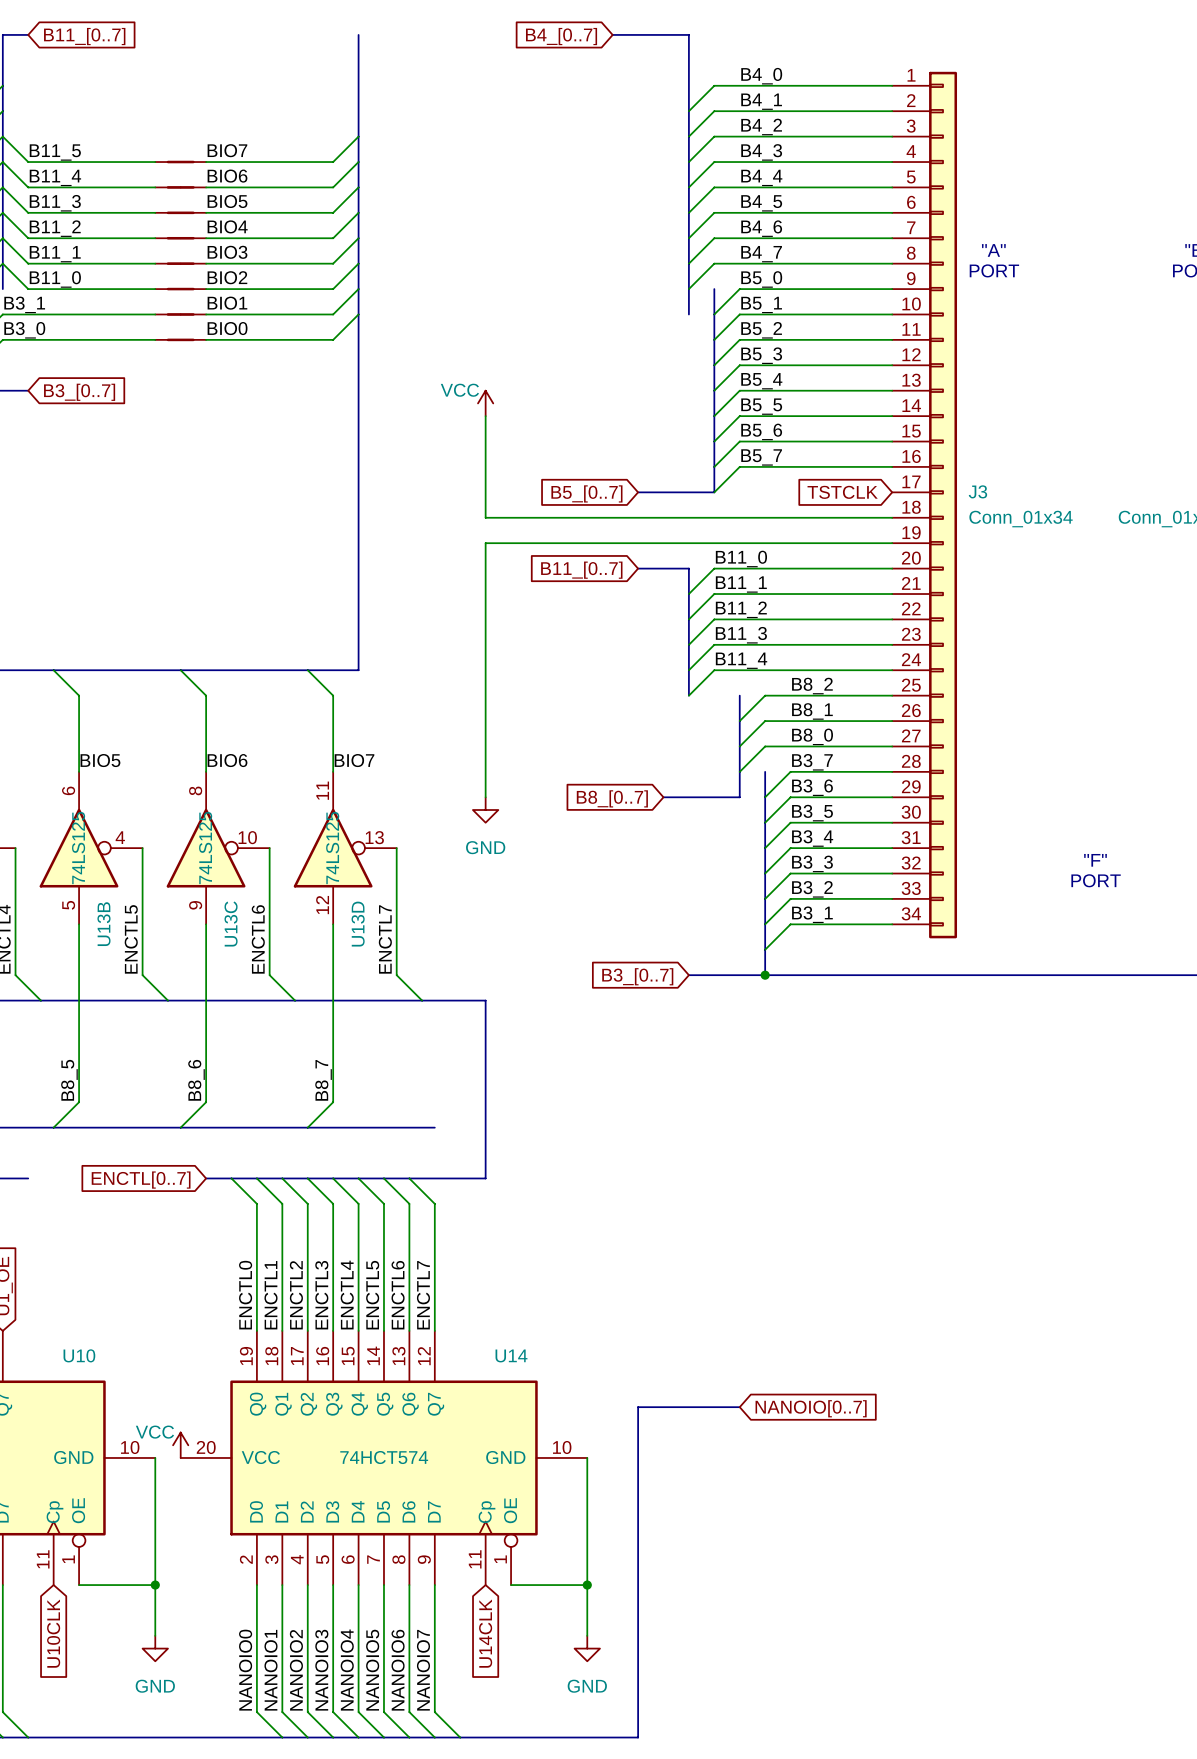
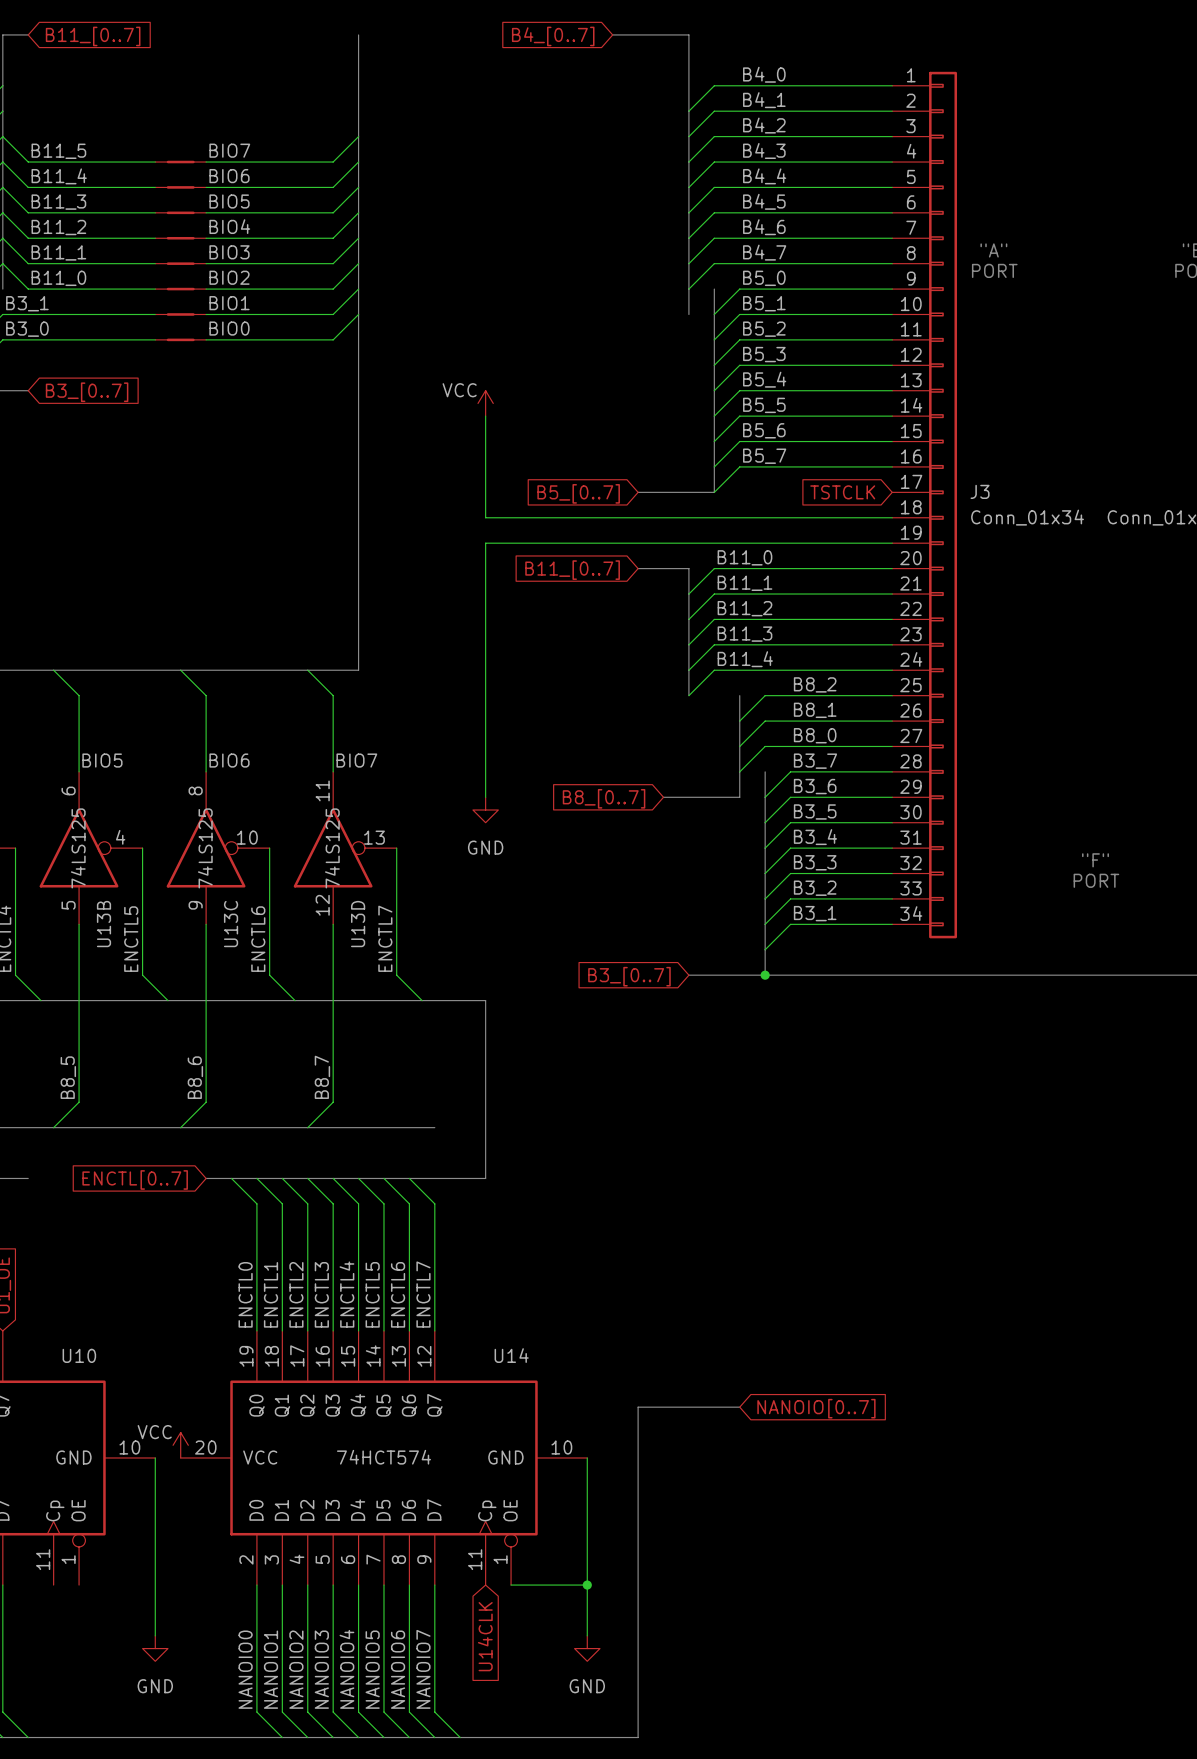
wire: (79, 1585) (155, 1585) -> none
junction: (155, 1585) -> none
global label: U10CLK (53, 1633) -> none

